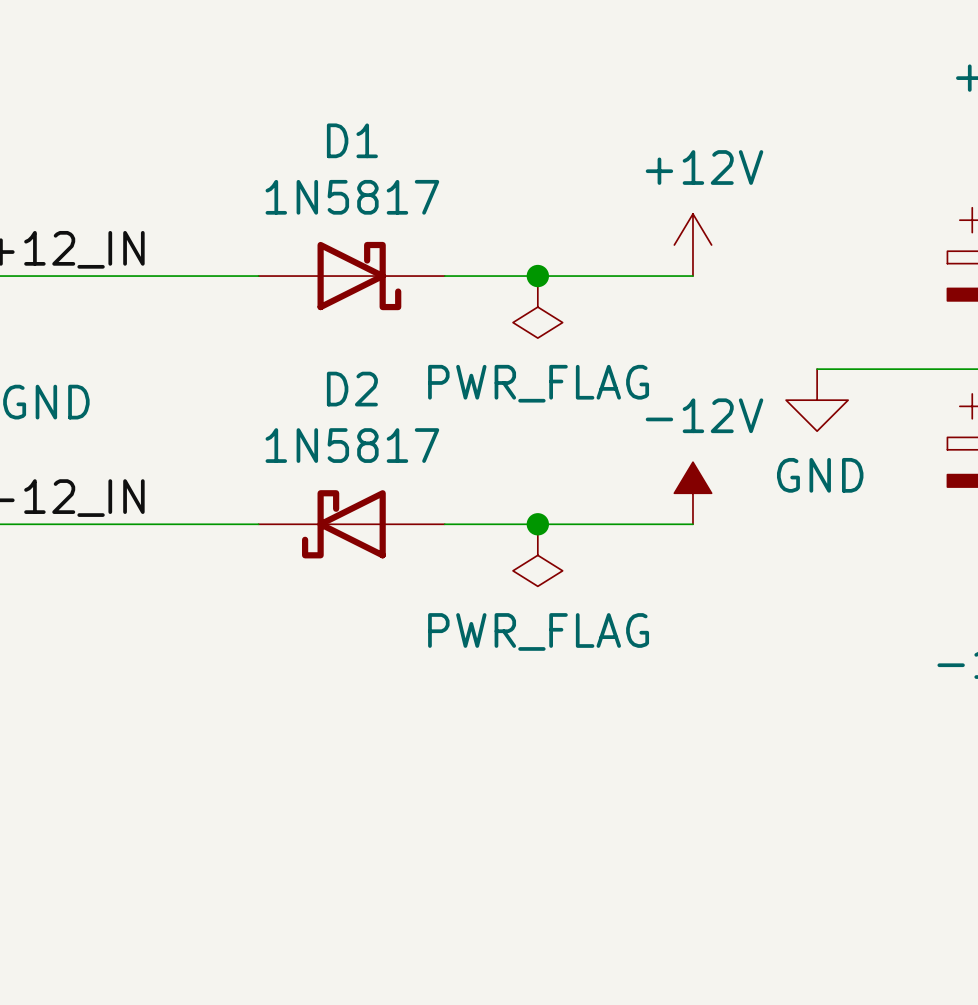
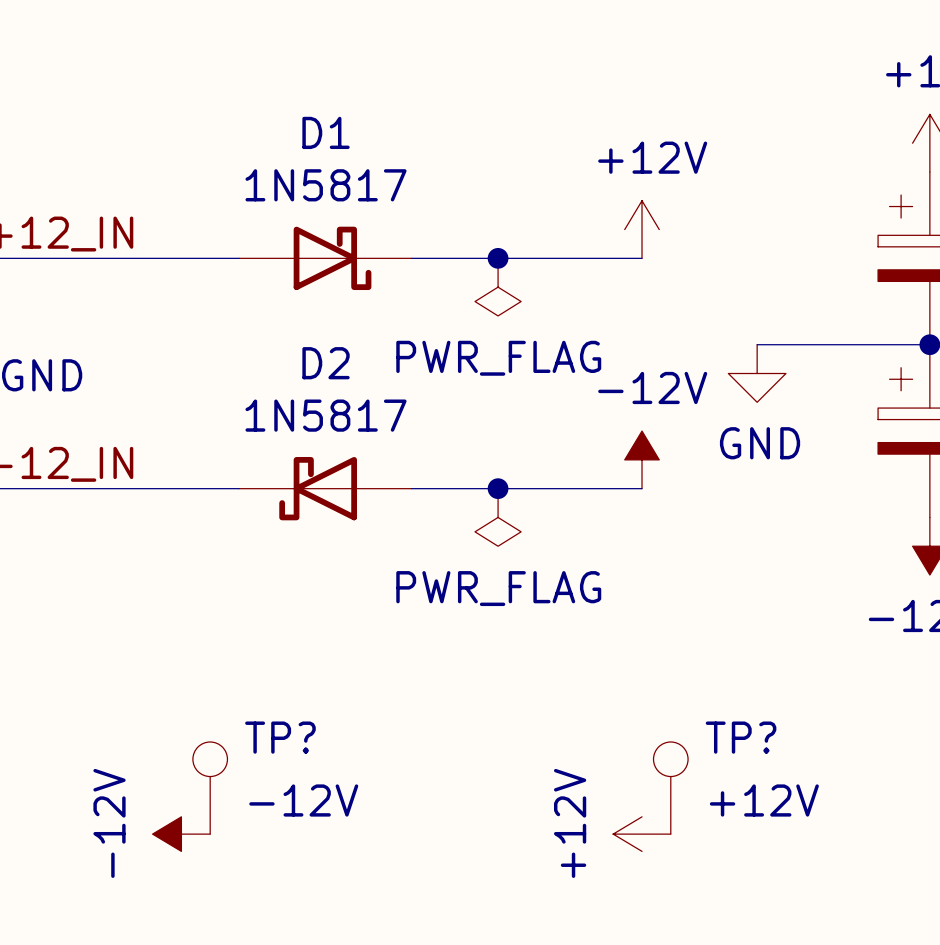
TP?: none -> -12V (210, 788)
TP?: none -> +12V (670, 788)
power symbol: none -> -12V (181, 834)
power symbol: none -> +12V (642, 834)

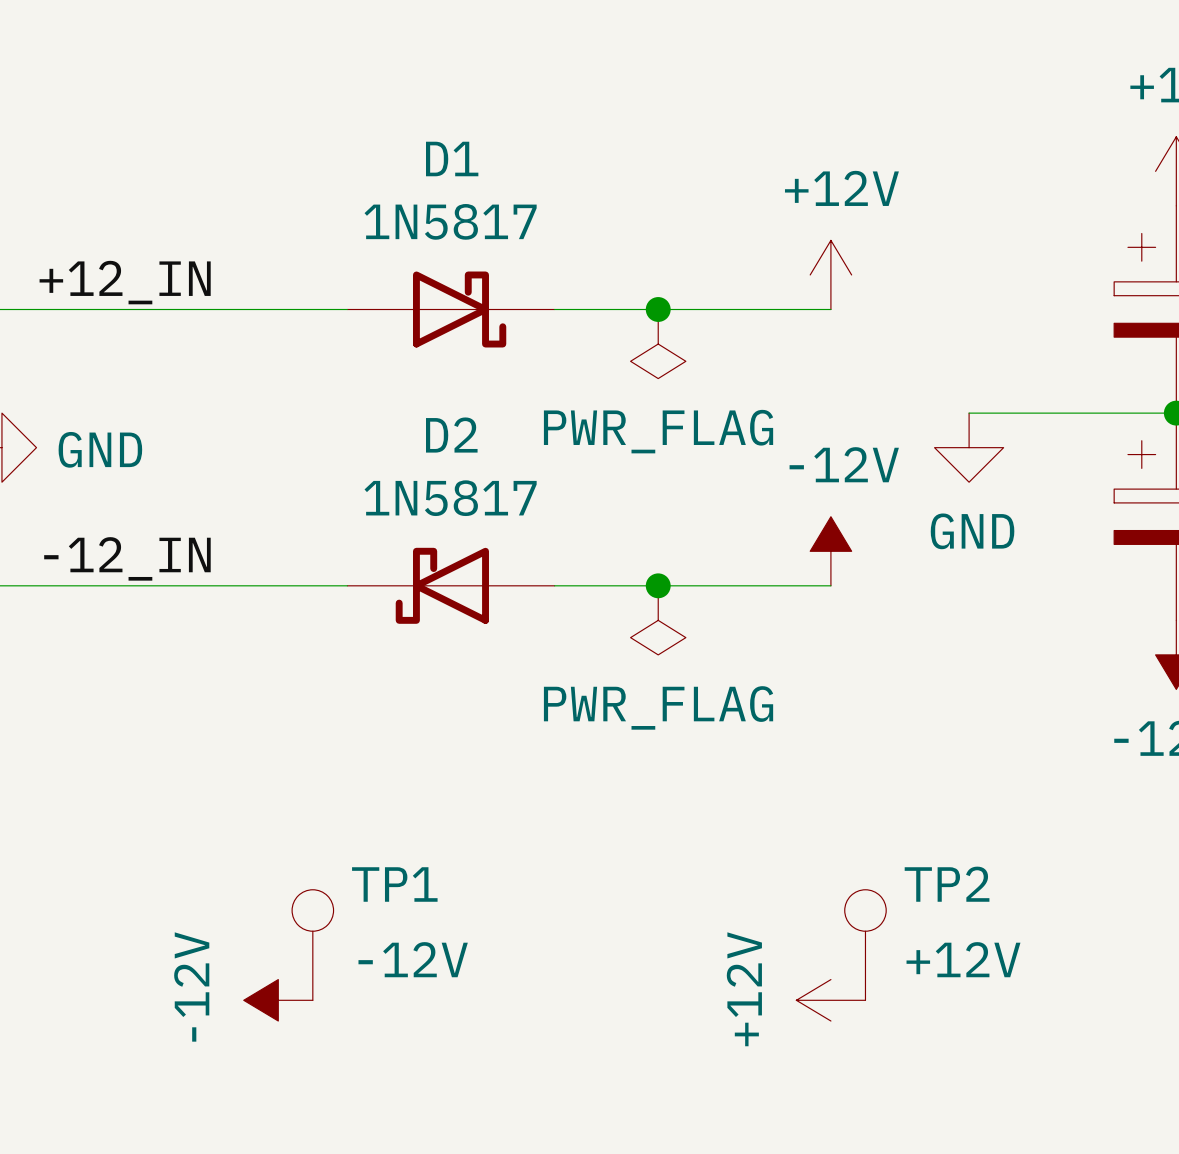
TP? name: TP? (280, 737) -> TP1 (394, 884)
TP? name: TP? (741, 737) -> TP2 (947, 884)

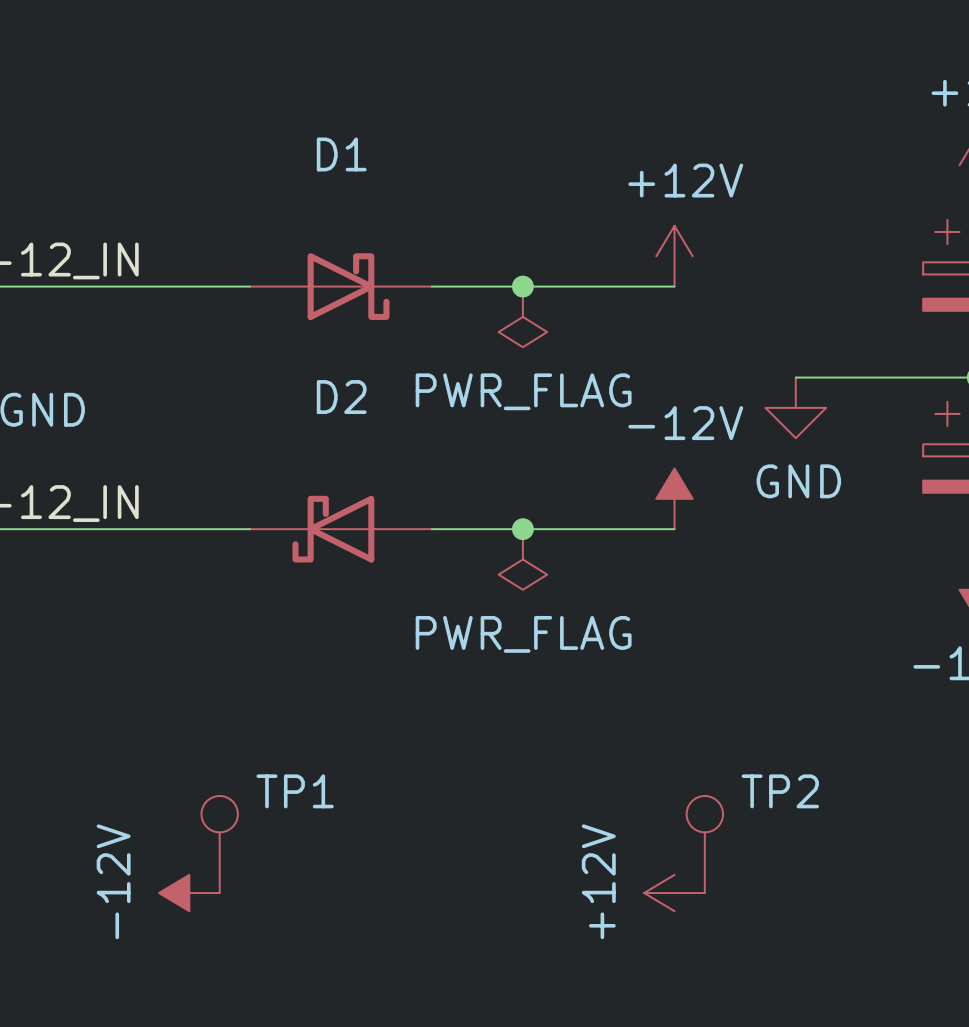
D1 value: 1N5817 (450, 221) -> none
D2 value: 1N5817 (450, 498) -> none
TP1 value: -12V (413, 959) -> none
TP2 value: +12V (963, 959) -> none

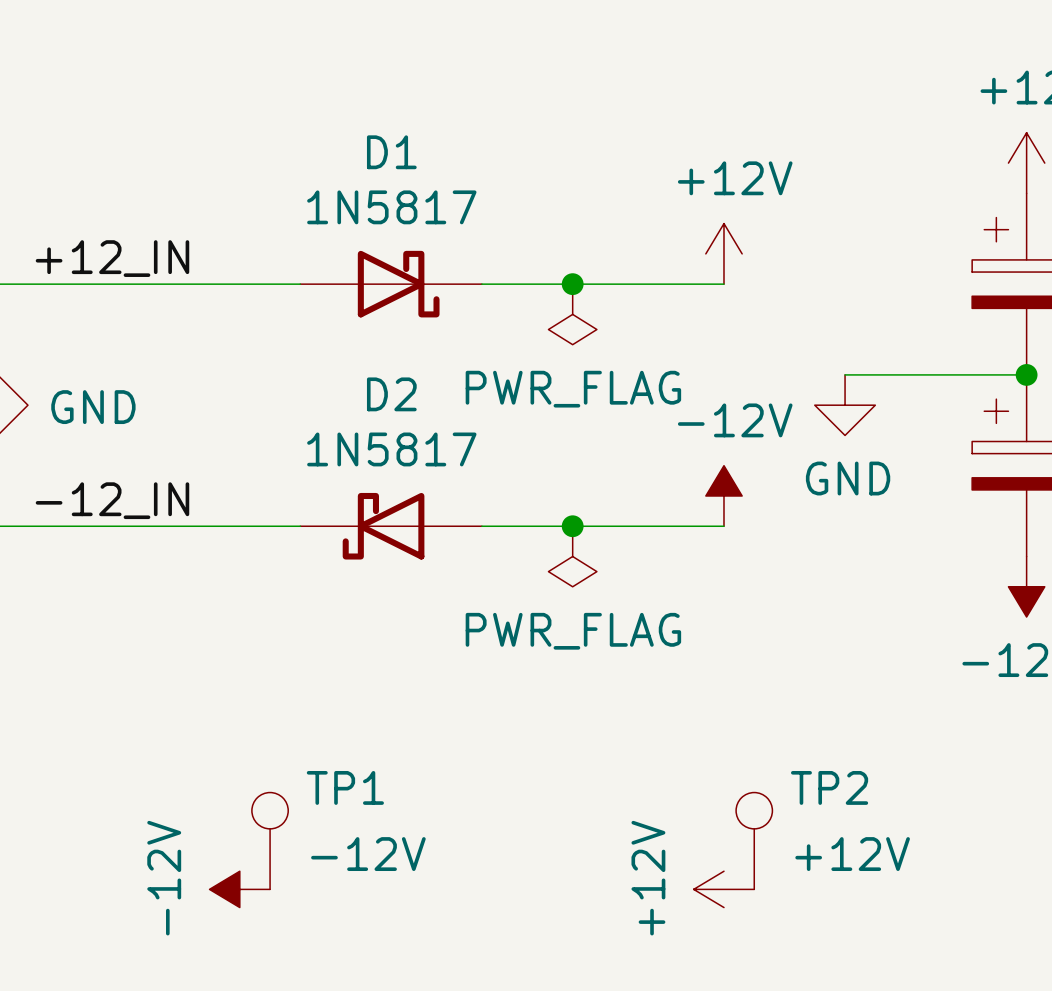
D1 value: none -> 1N5817 (391, 207)
D2 value: none -> 1N5817 (391, 449)
TP1 value: none -> -12V (368, 854)
TP2 value: none -> +12V (852, 854)

